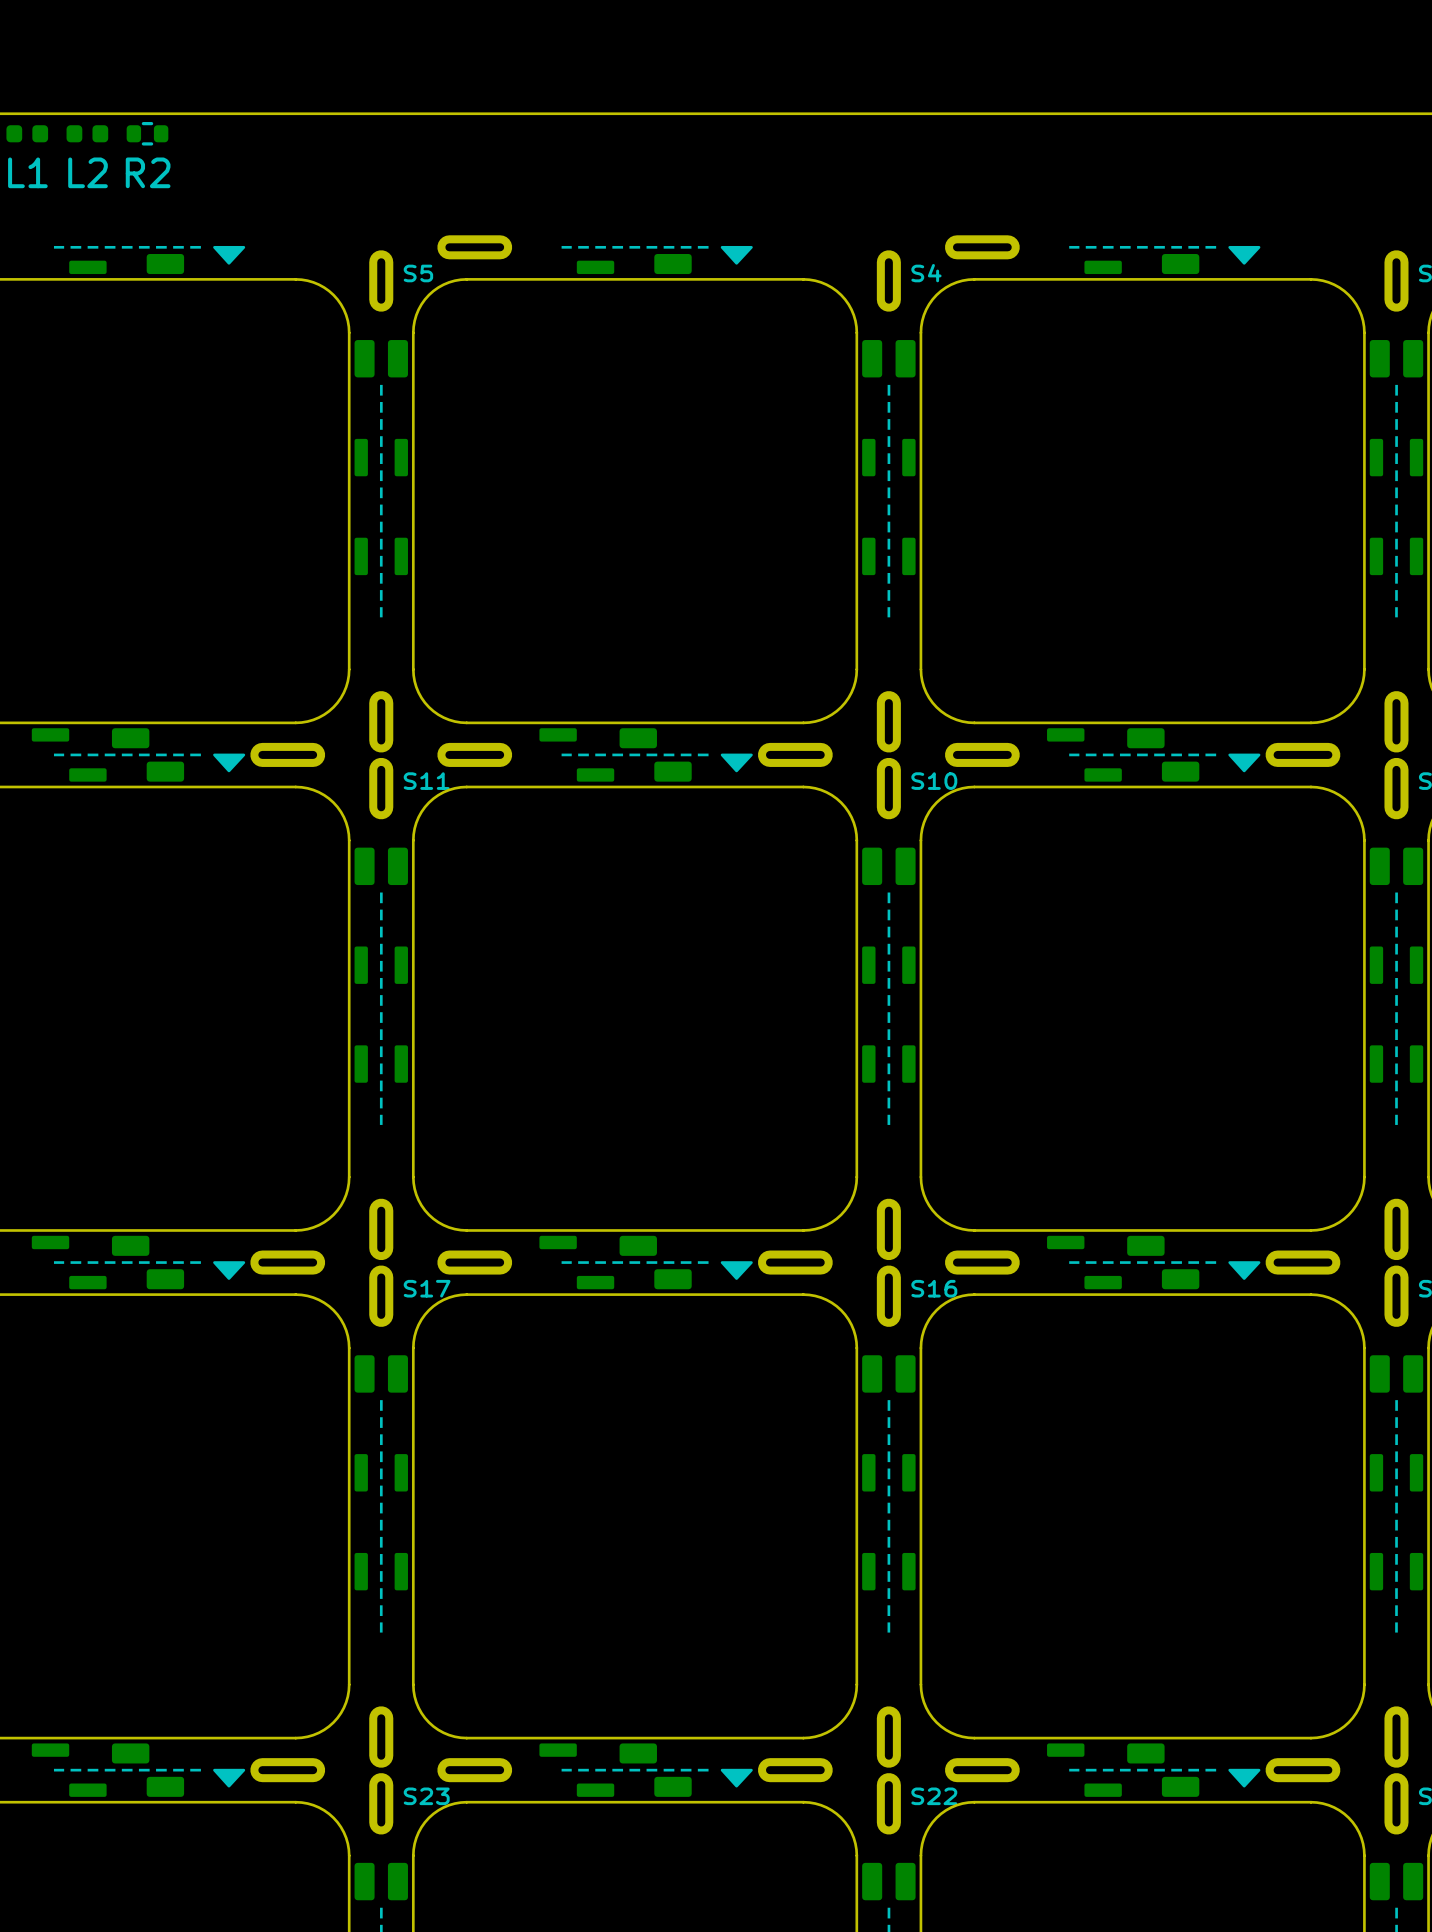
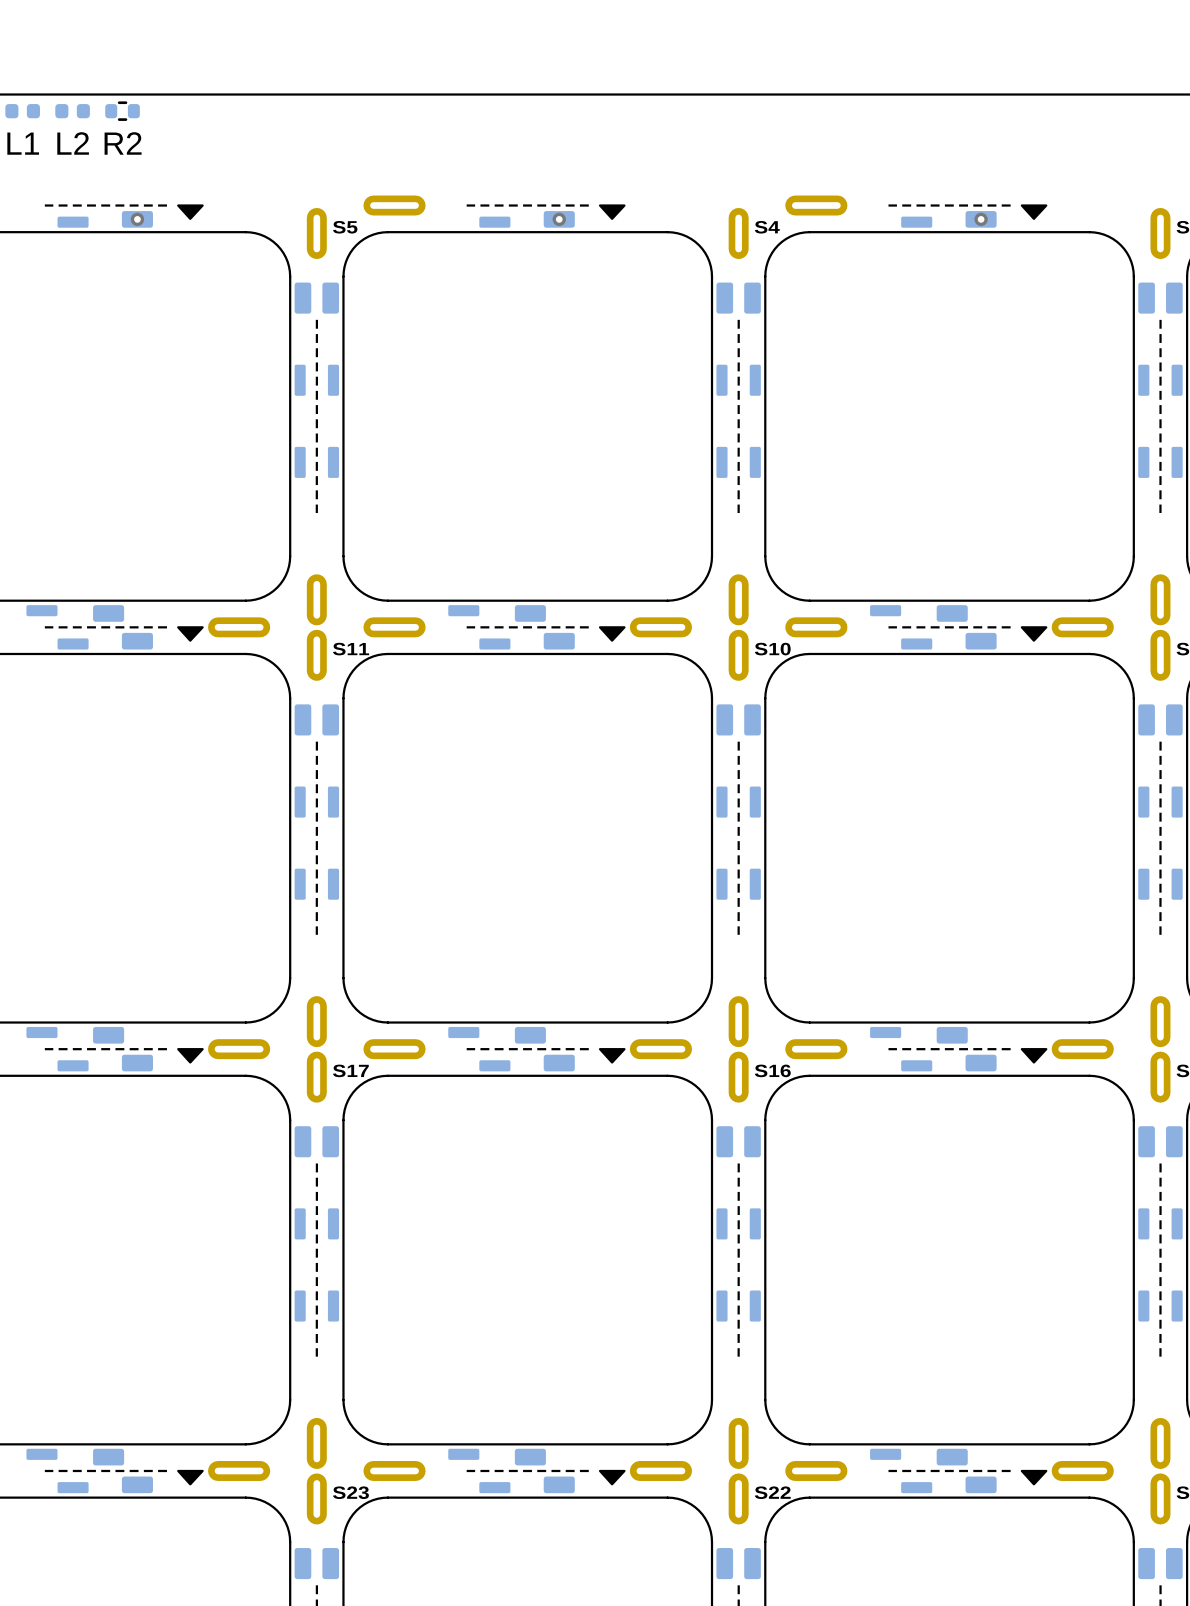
via: none -> (137, 219)
via: none -> (559, 219)
via: none -> (981, 219)

